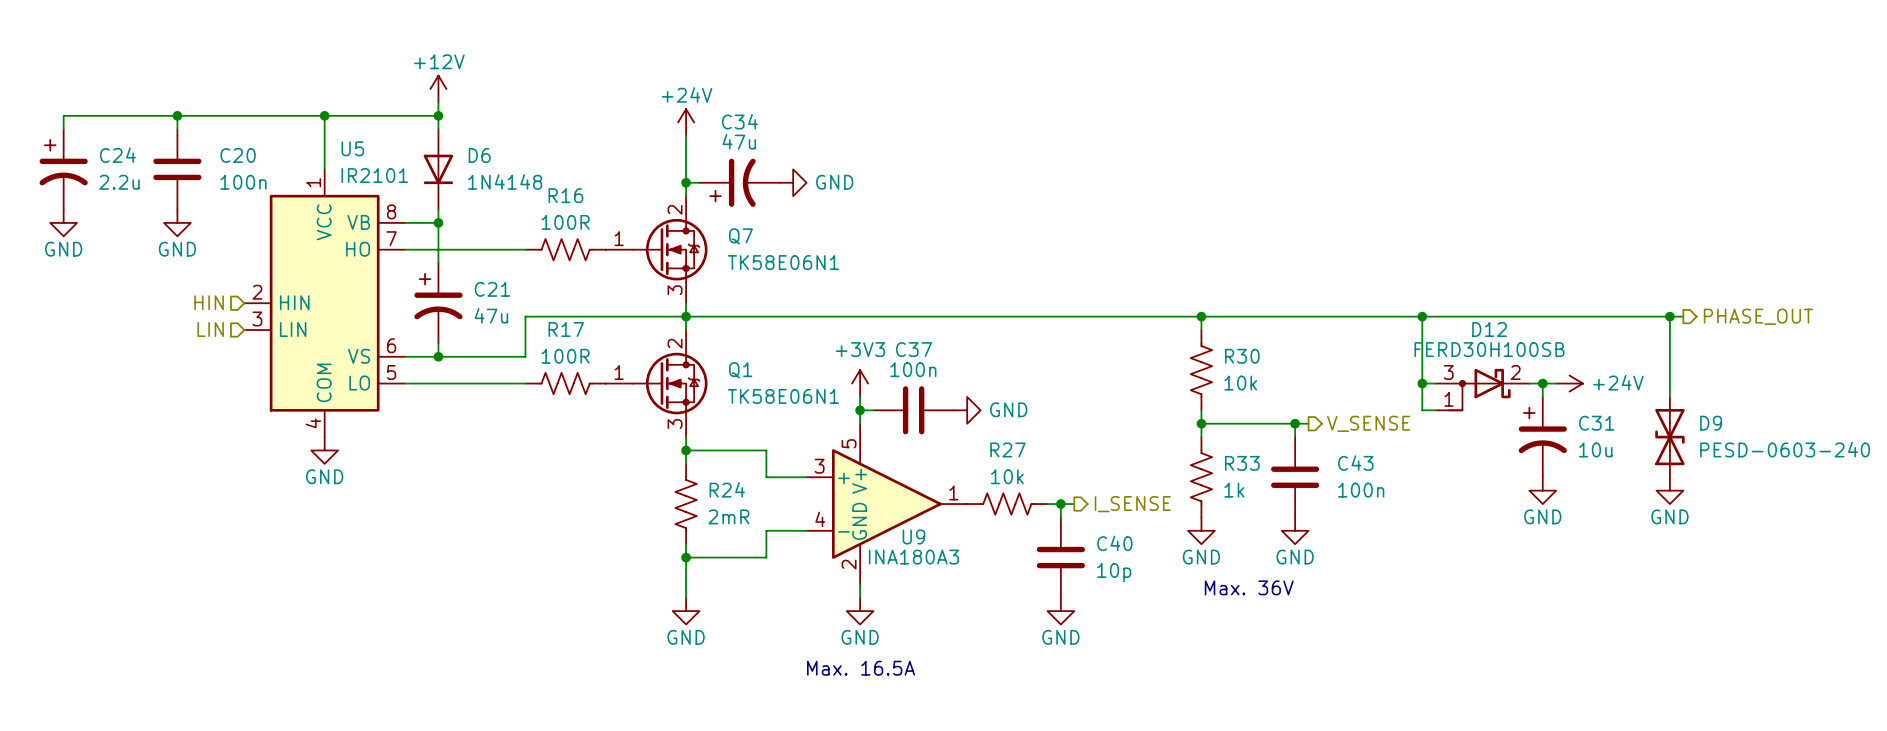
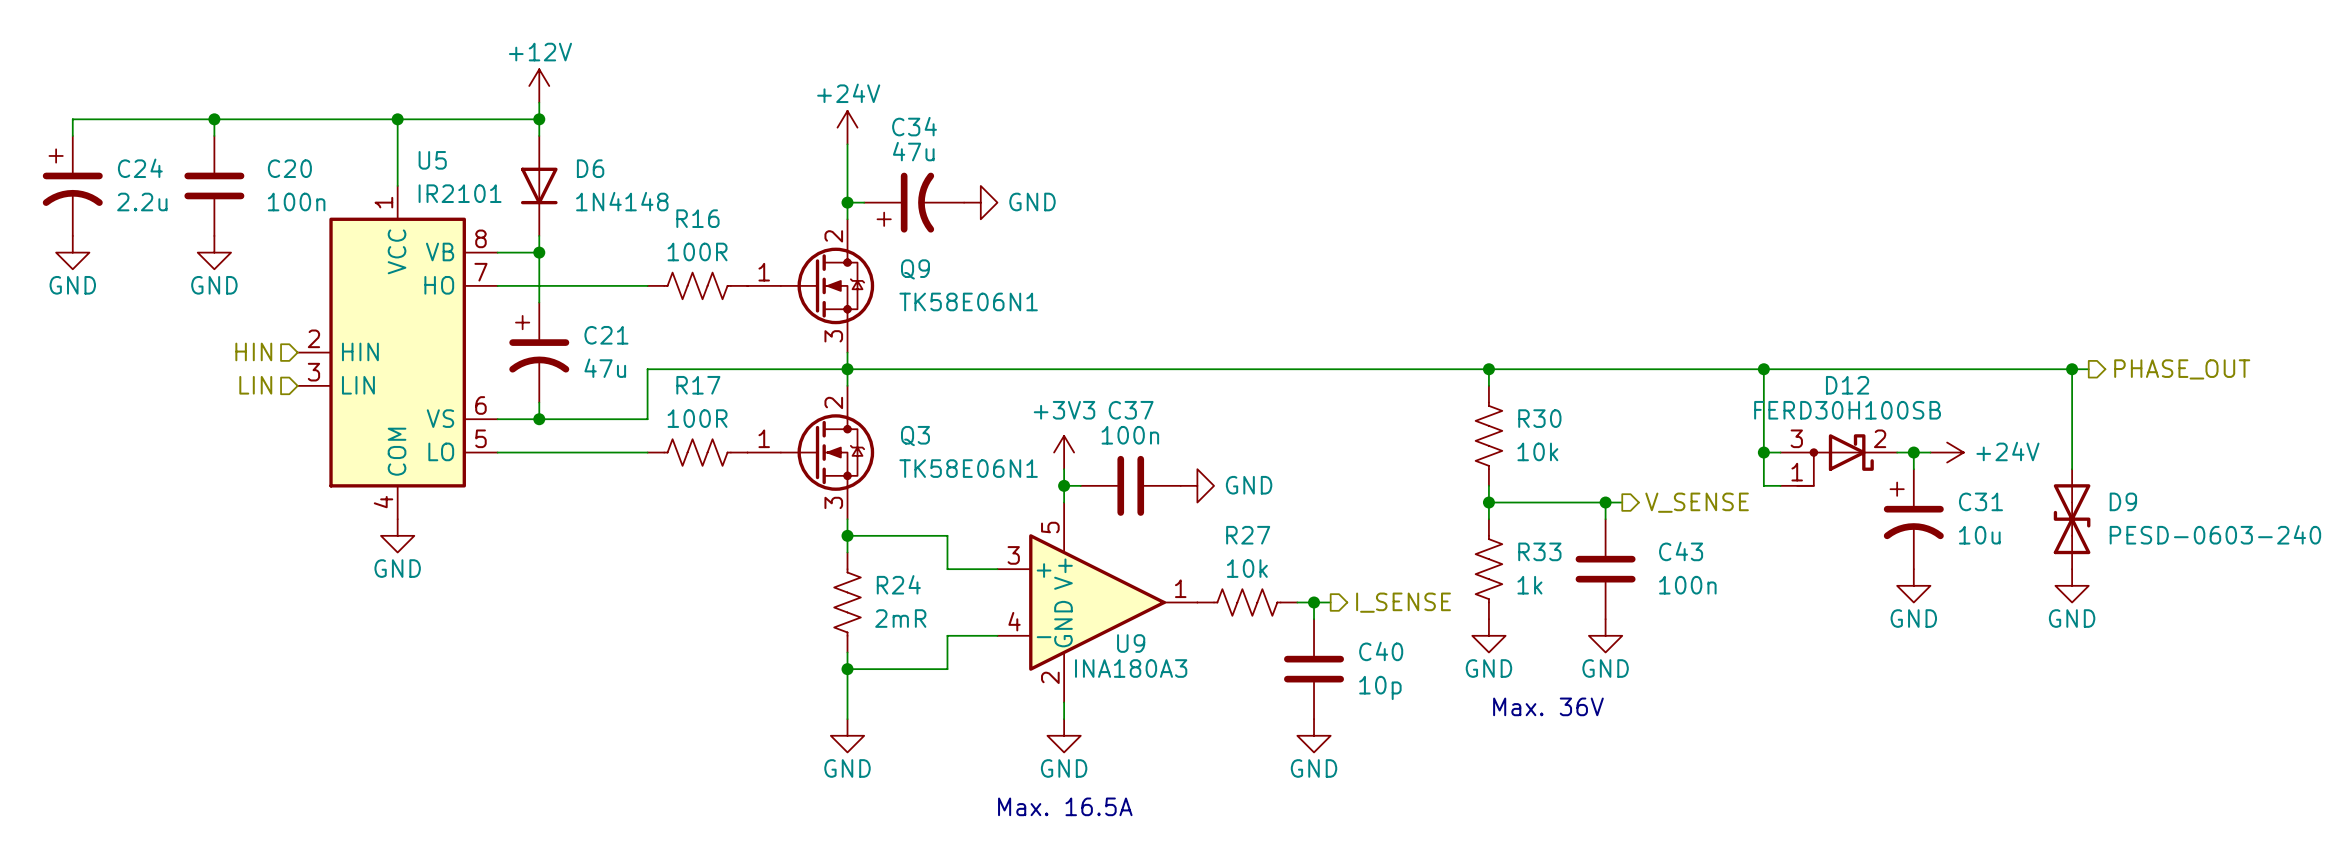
Q7 name: Q7 (741, 236) -> Q9 (915, 269)
Q1 name: Q1 (740, 370) -> Q3 (915, 436)

